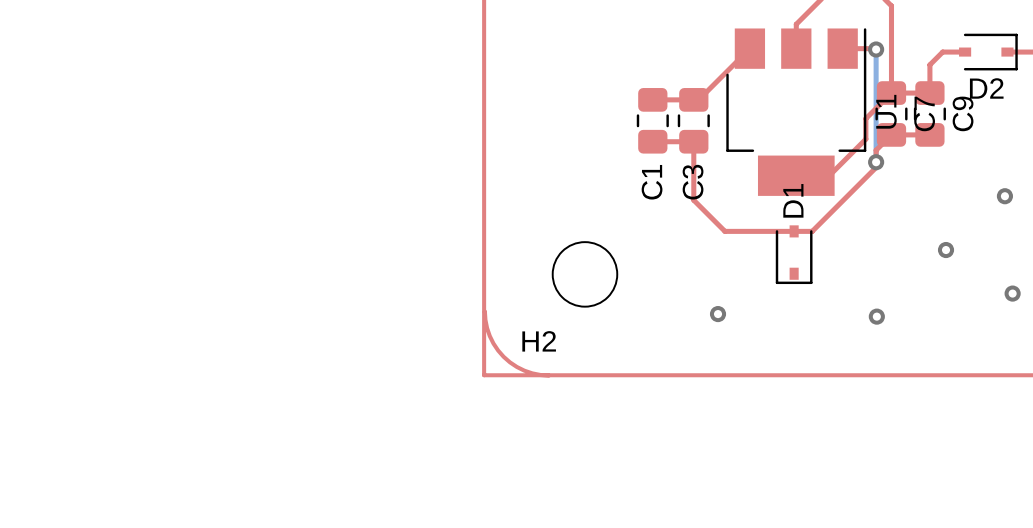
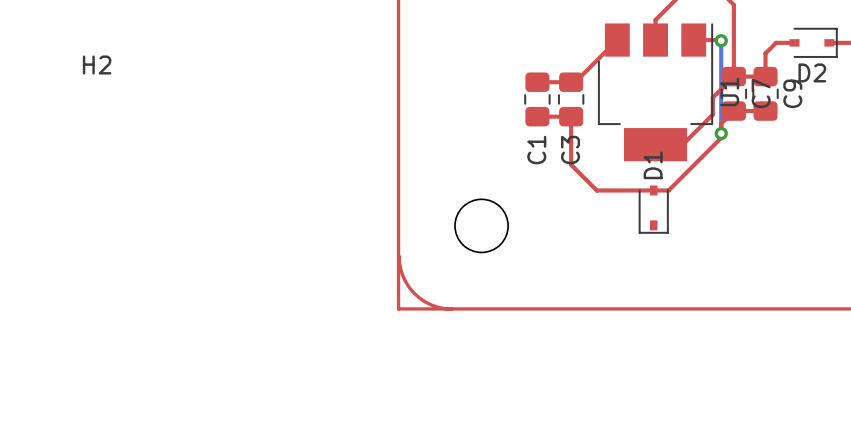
via: (1004, 196) -> none
via: (946, 250) -> none
via: (1012, 293) -> none
via: (718, 314) -> none
via: (876, 316) -> none
H2 name position: H2 (539, 341) -> H2 (97, 65)

